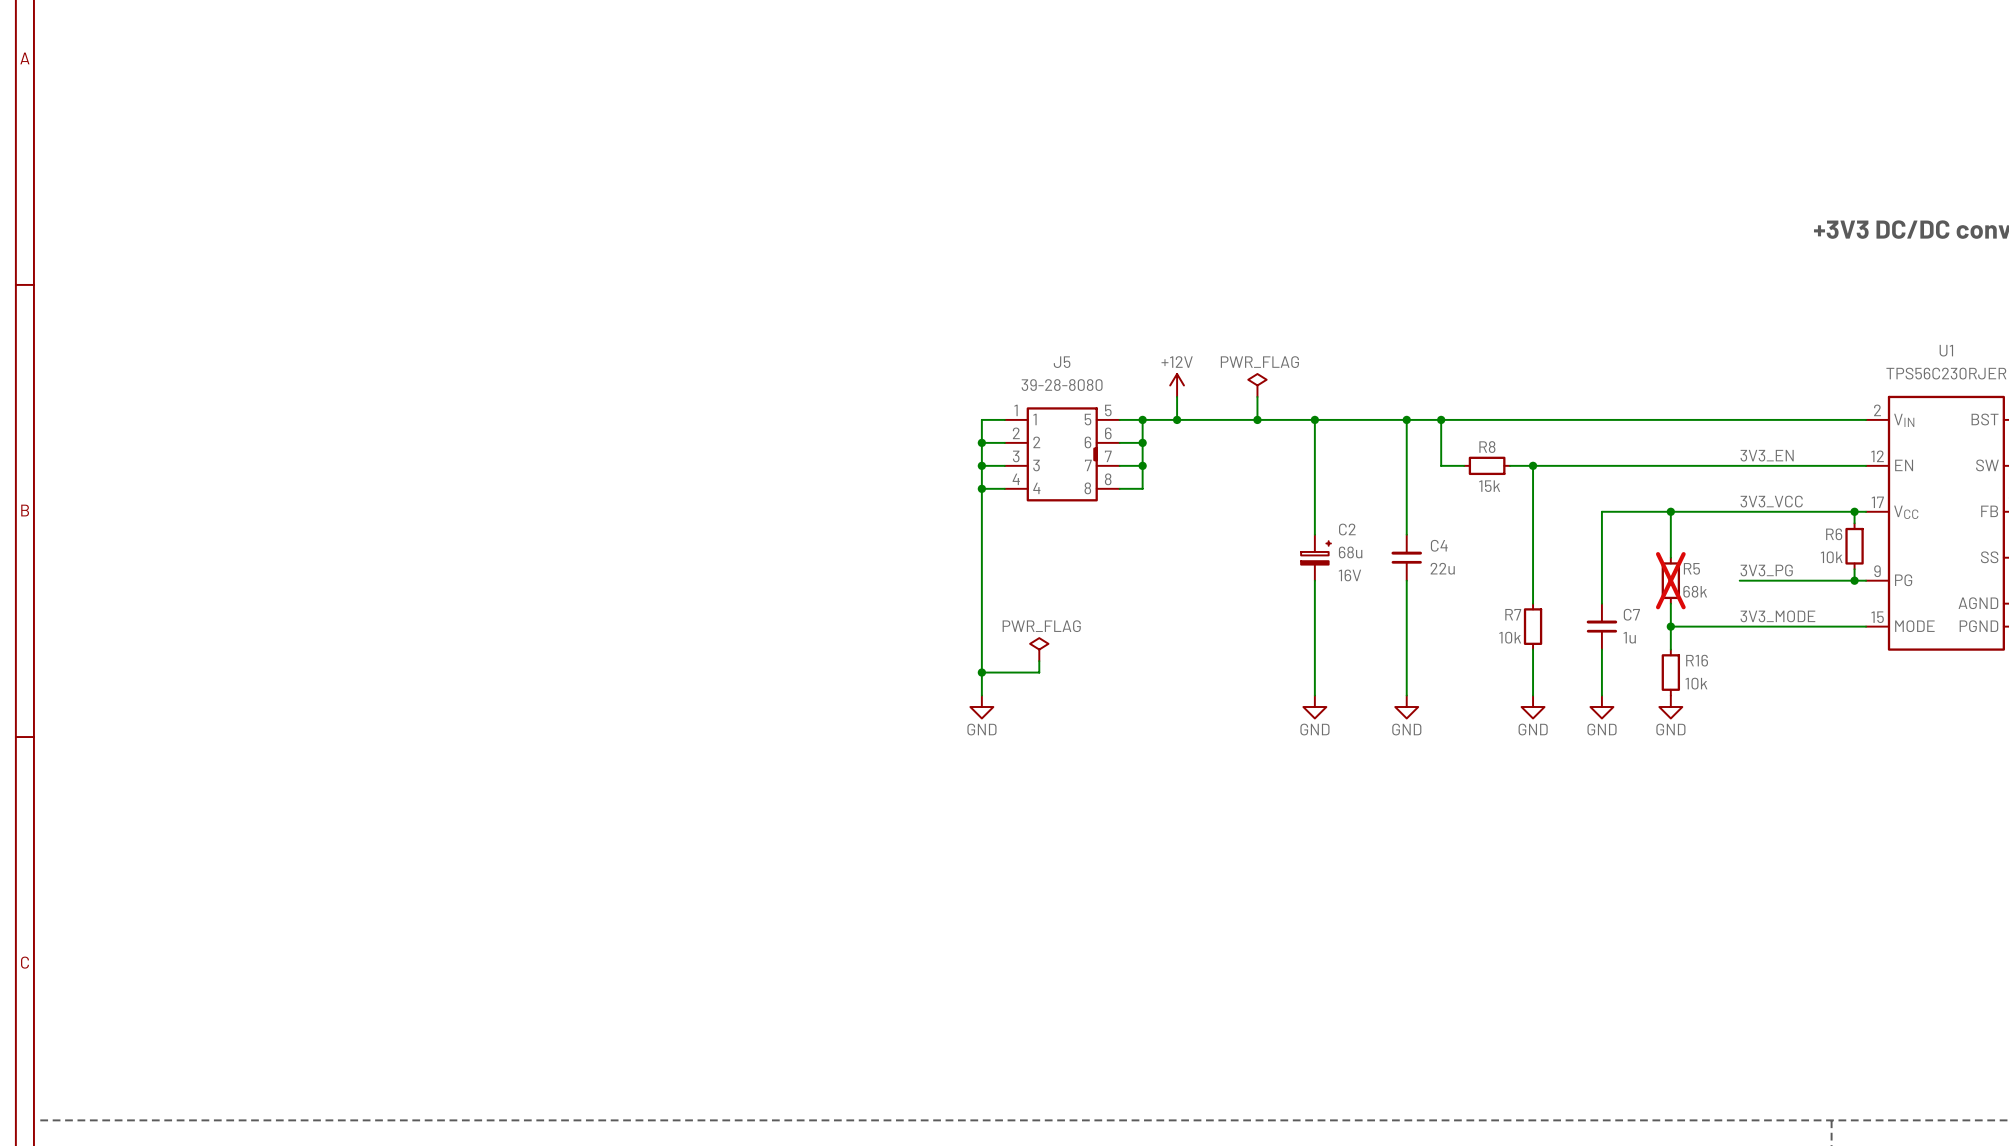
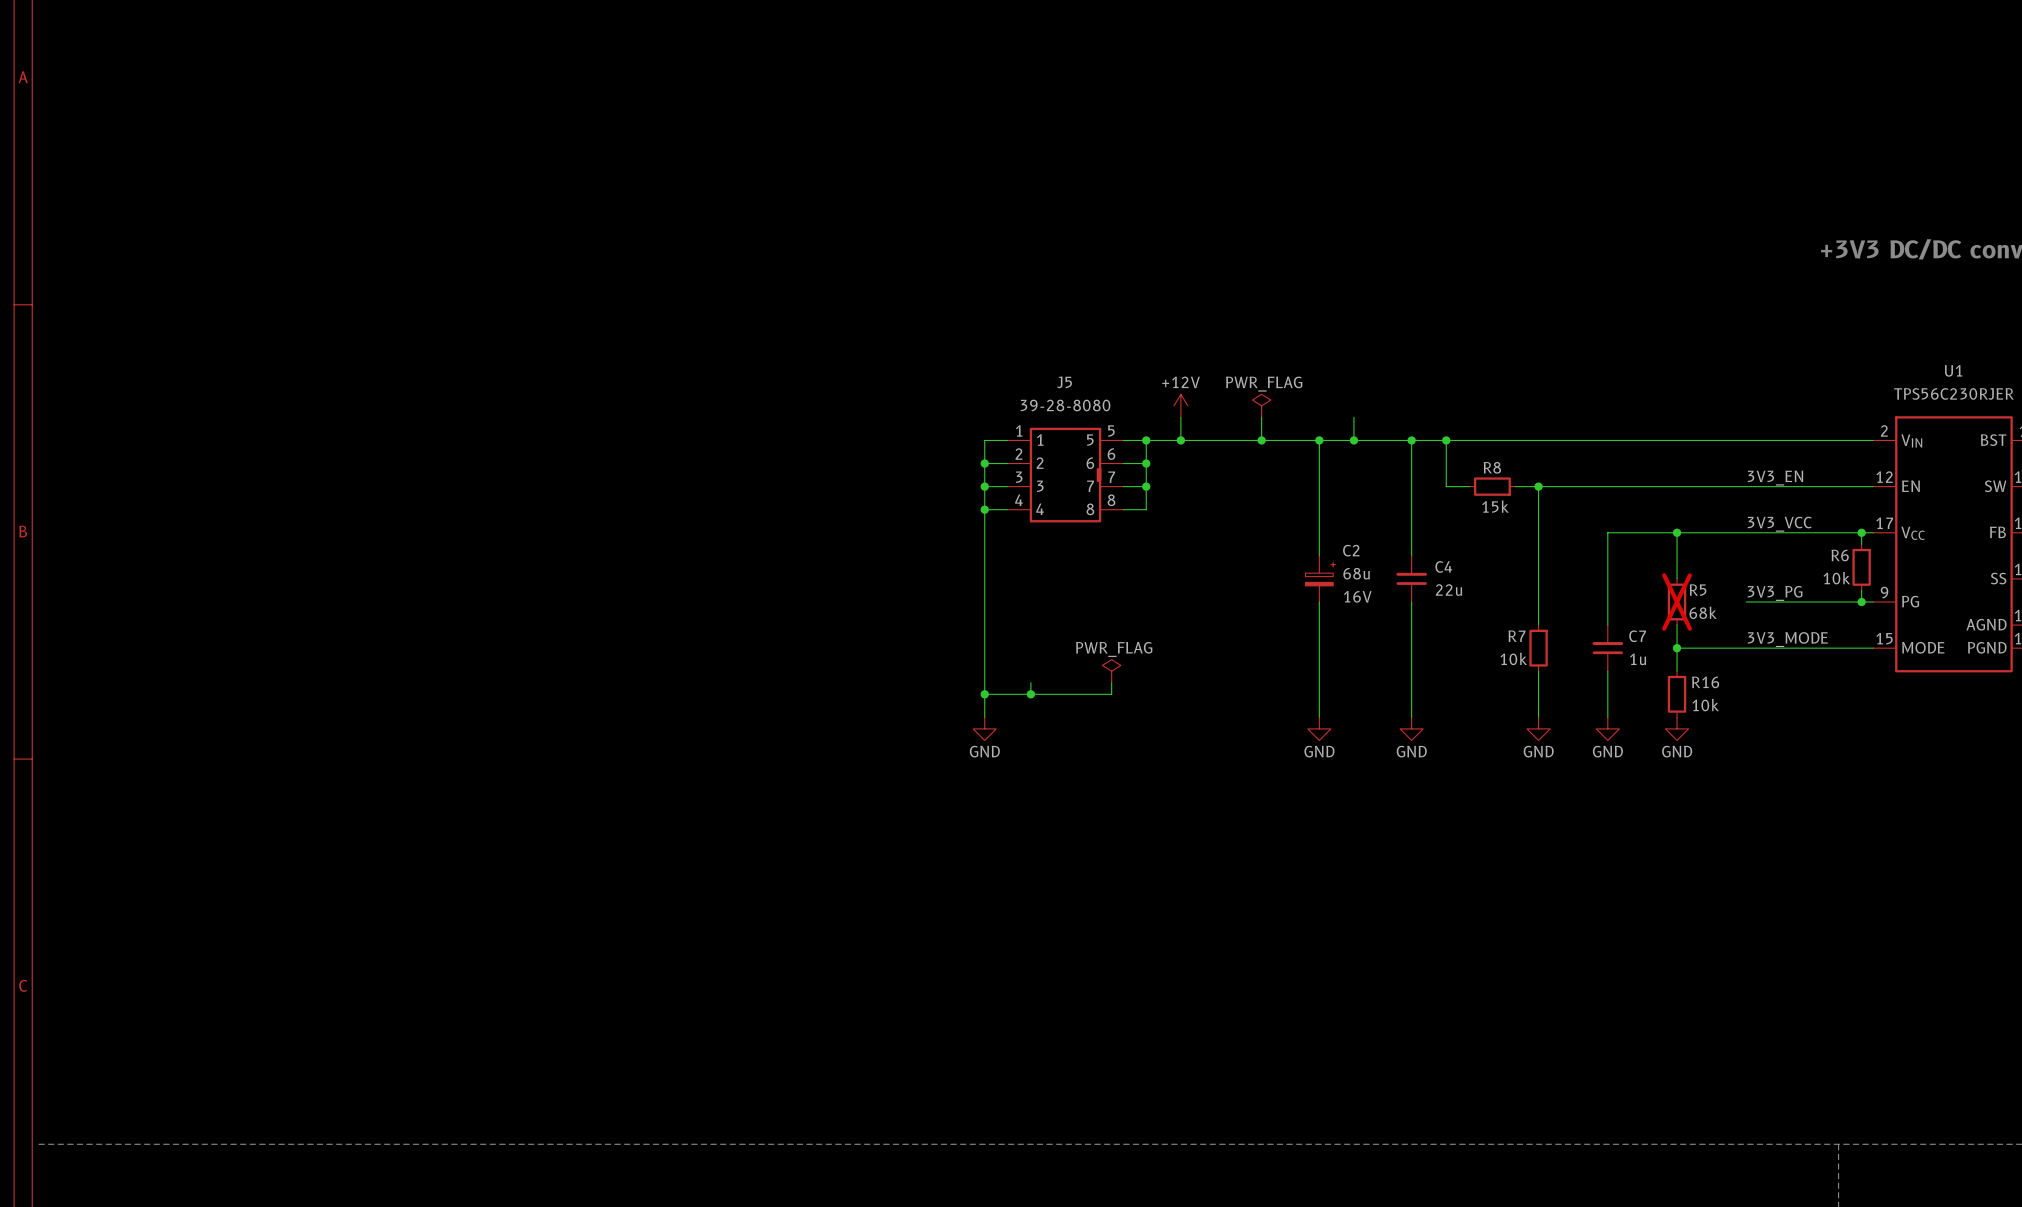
wire: none -> (1353, 417) (1353, 440)
junction: none -> (1353, 440)
power symbol position: PWR_FLAG (1039, 649) -> PWR_FLAG (1111, 671)
wire: none -> (1030, 682) (1030, 694)
wire: (1039, 661) (1039, 672) -> (1111, 682) (1111, 694) (1042, 694)
junction: none -> (1030, 694)

